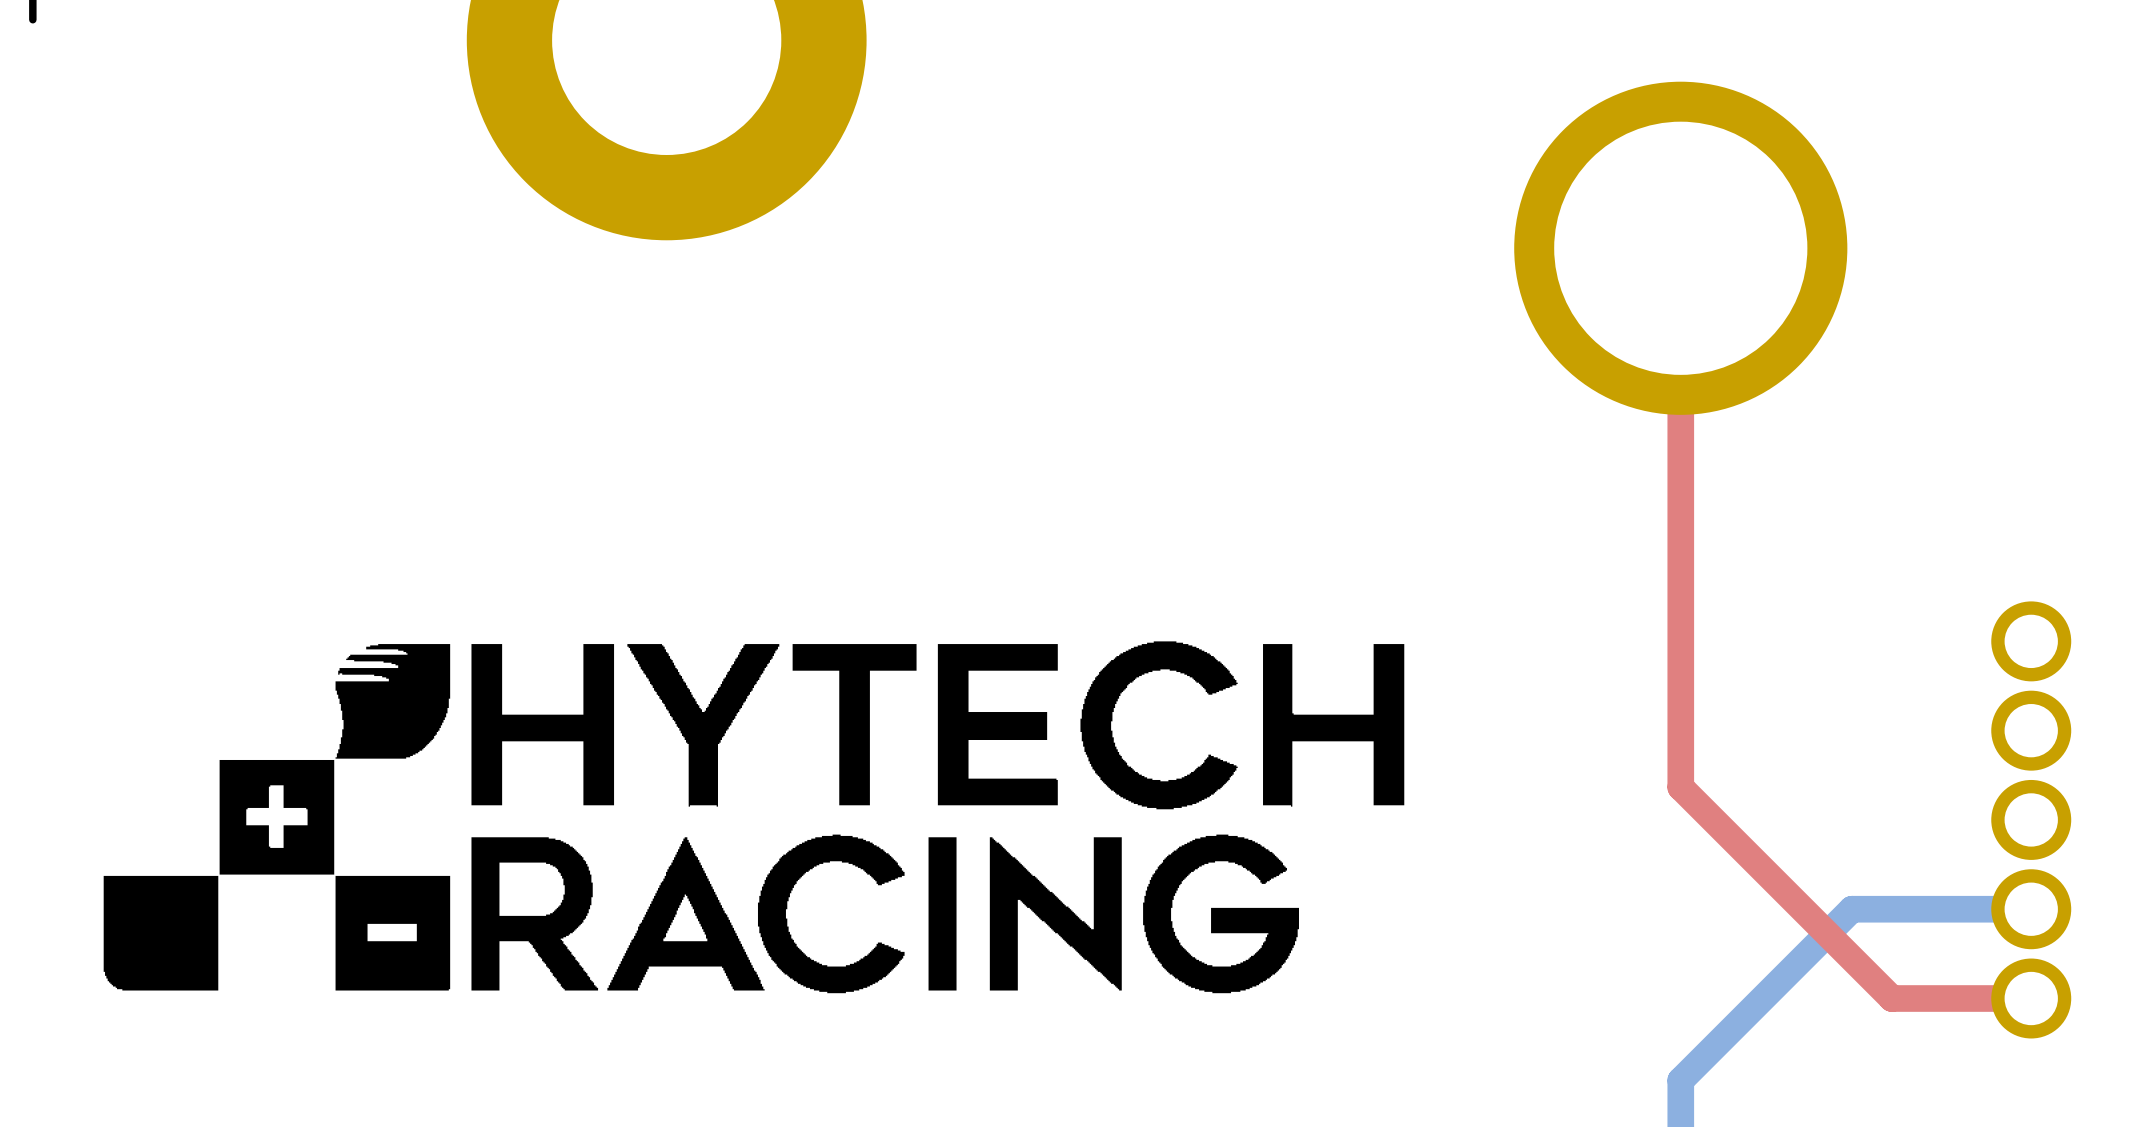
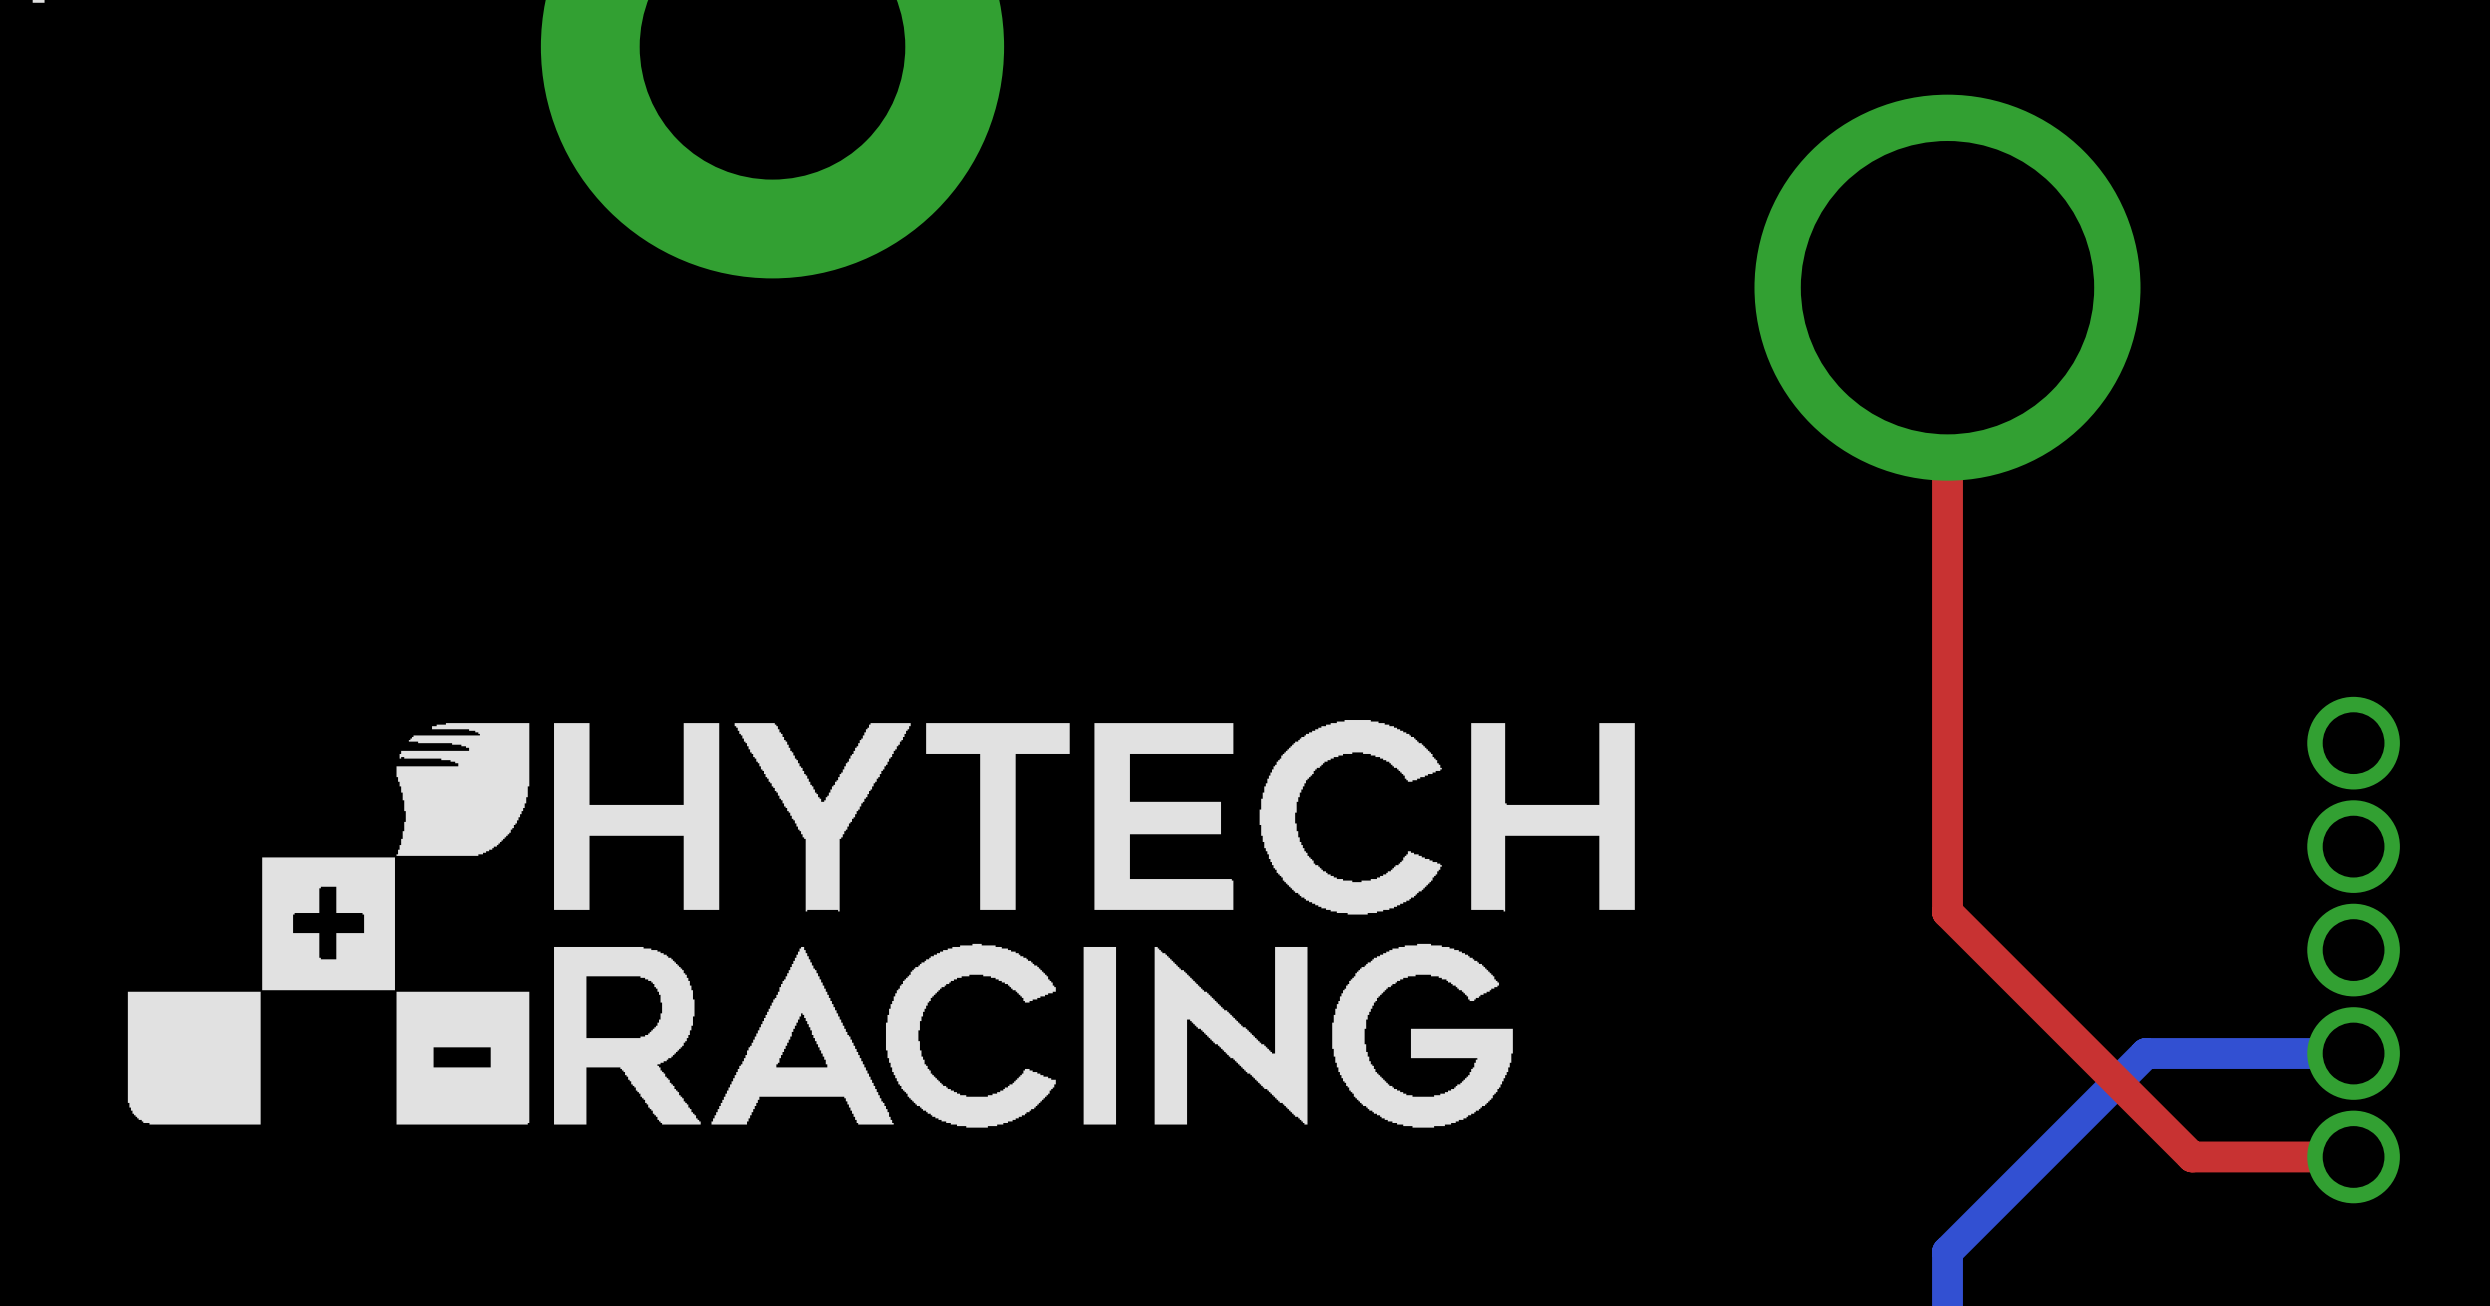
drawing position: (753, 817) -> (881, 923)

